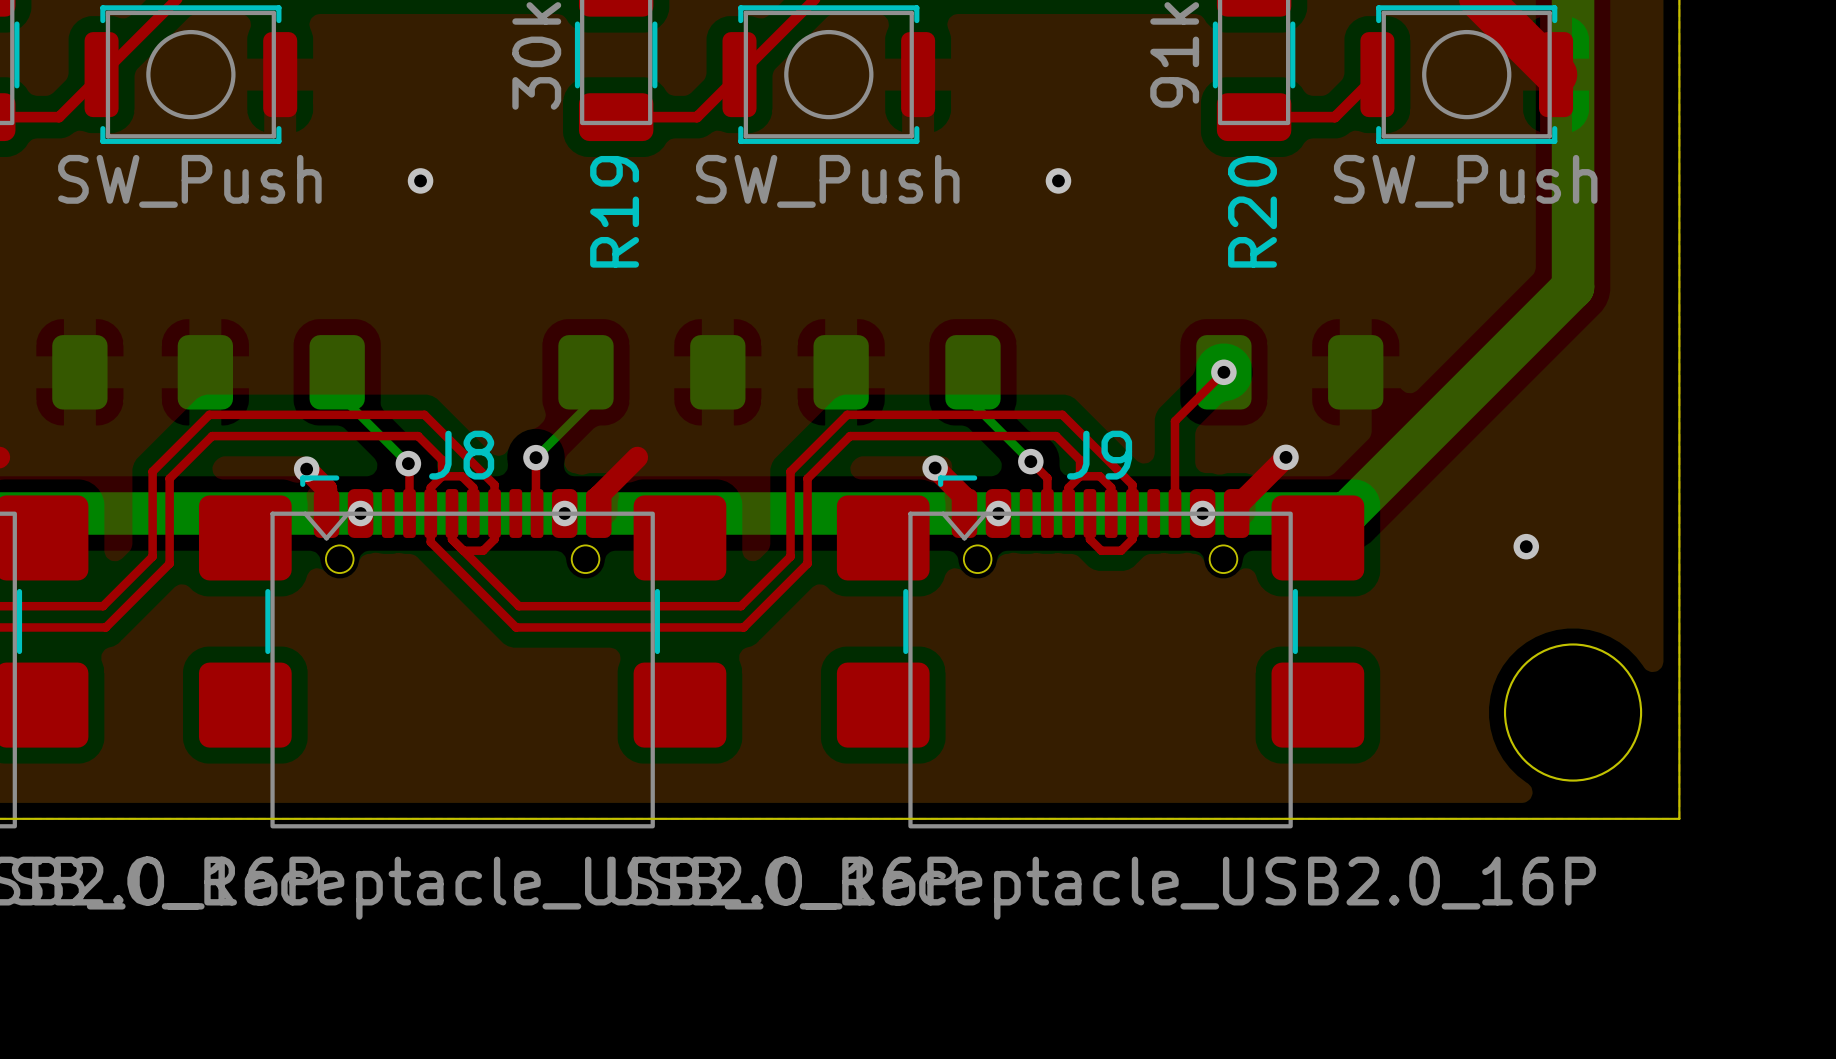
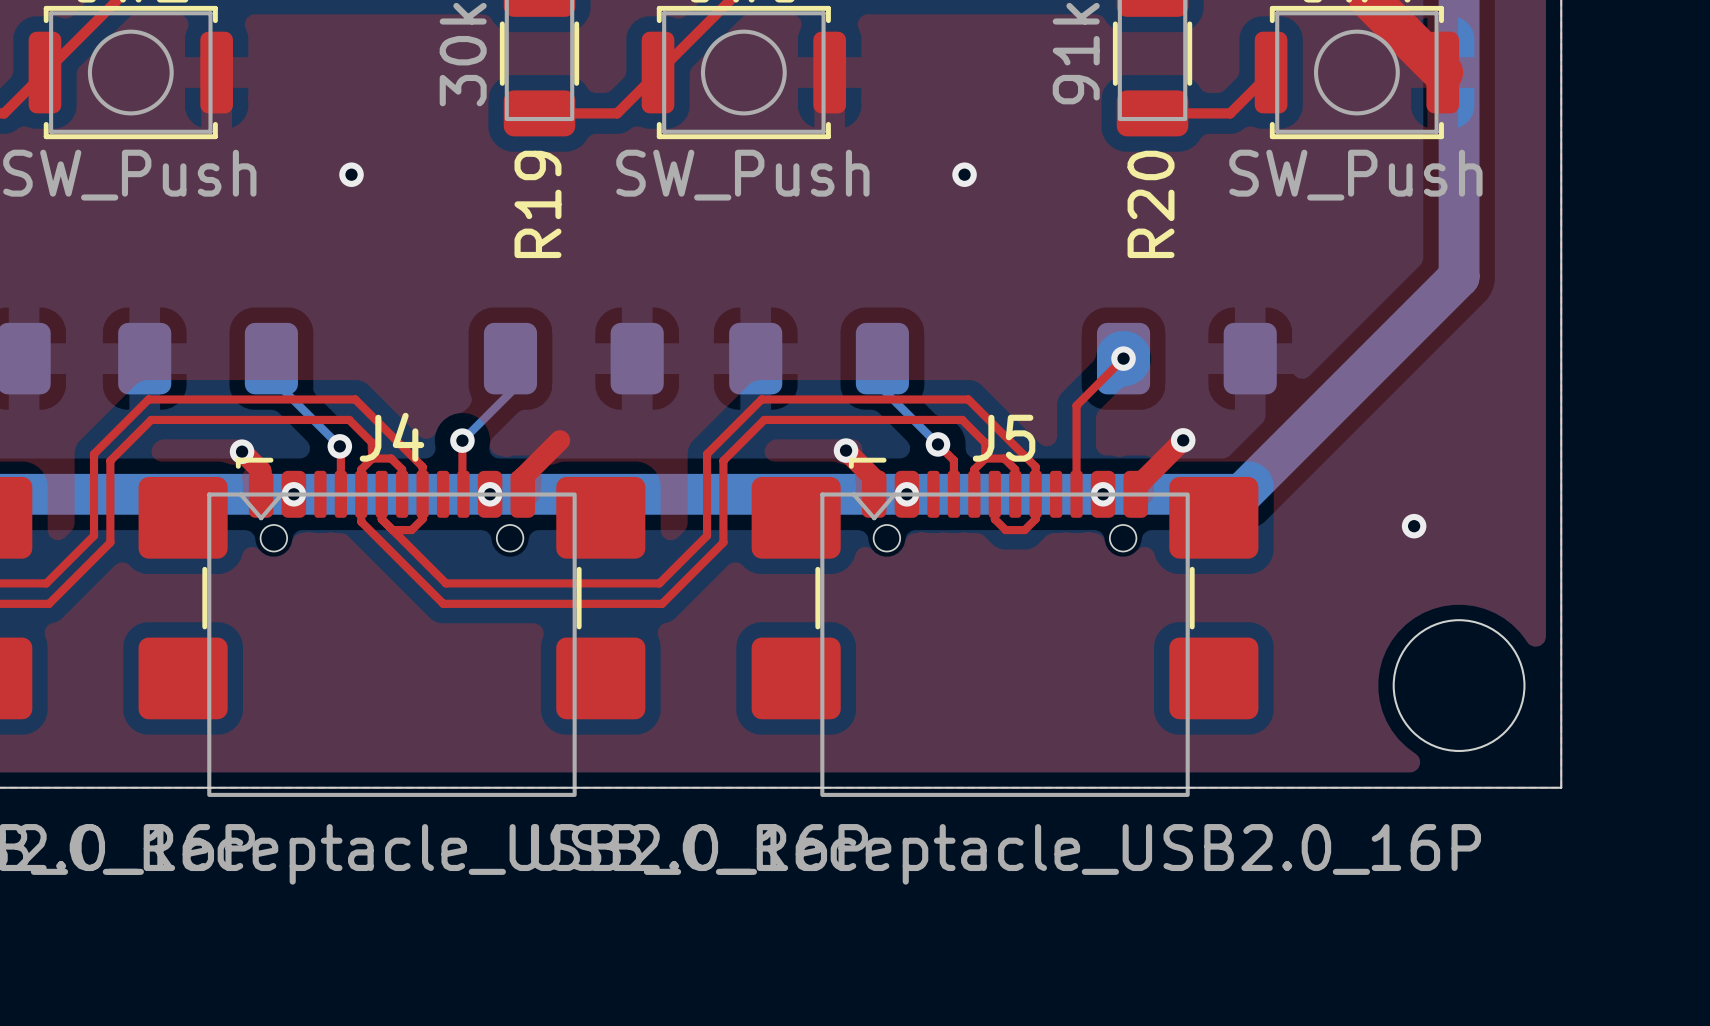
J8 name: J8 (461, 455) -> J4 (391, 437)
J9 name: J9 (1099, 455) -> J5 (1004, 438)

